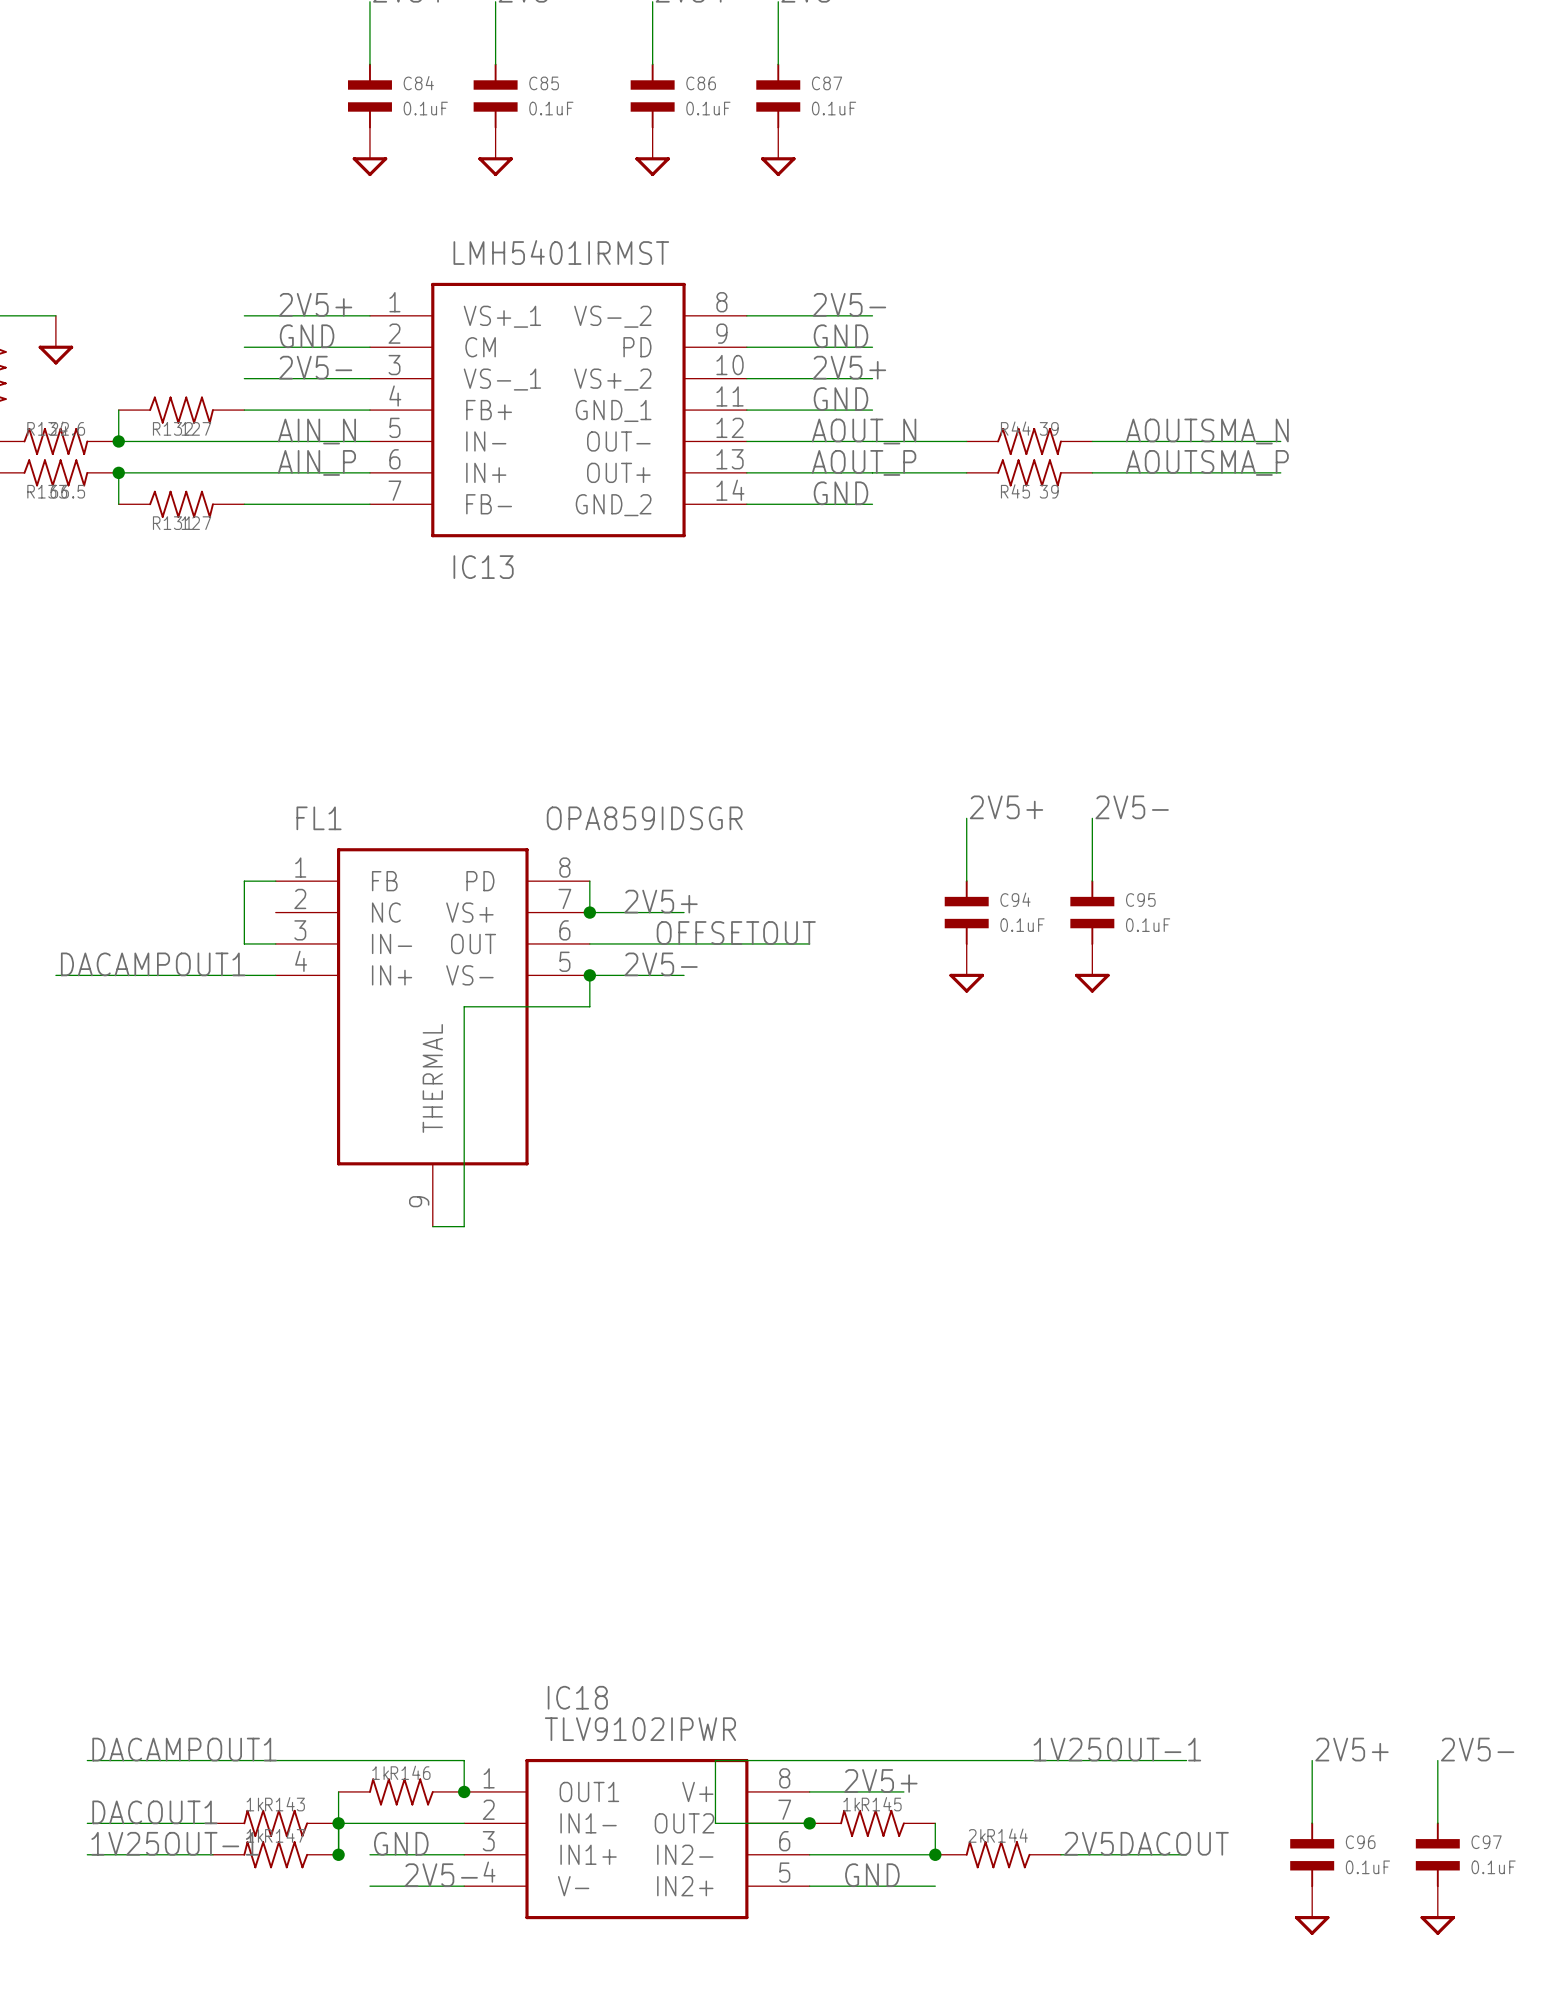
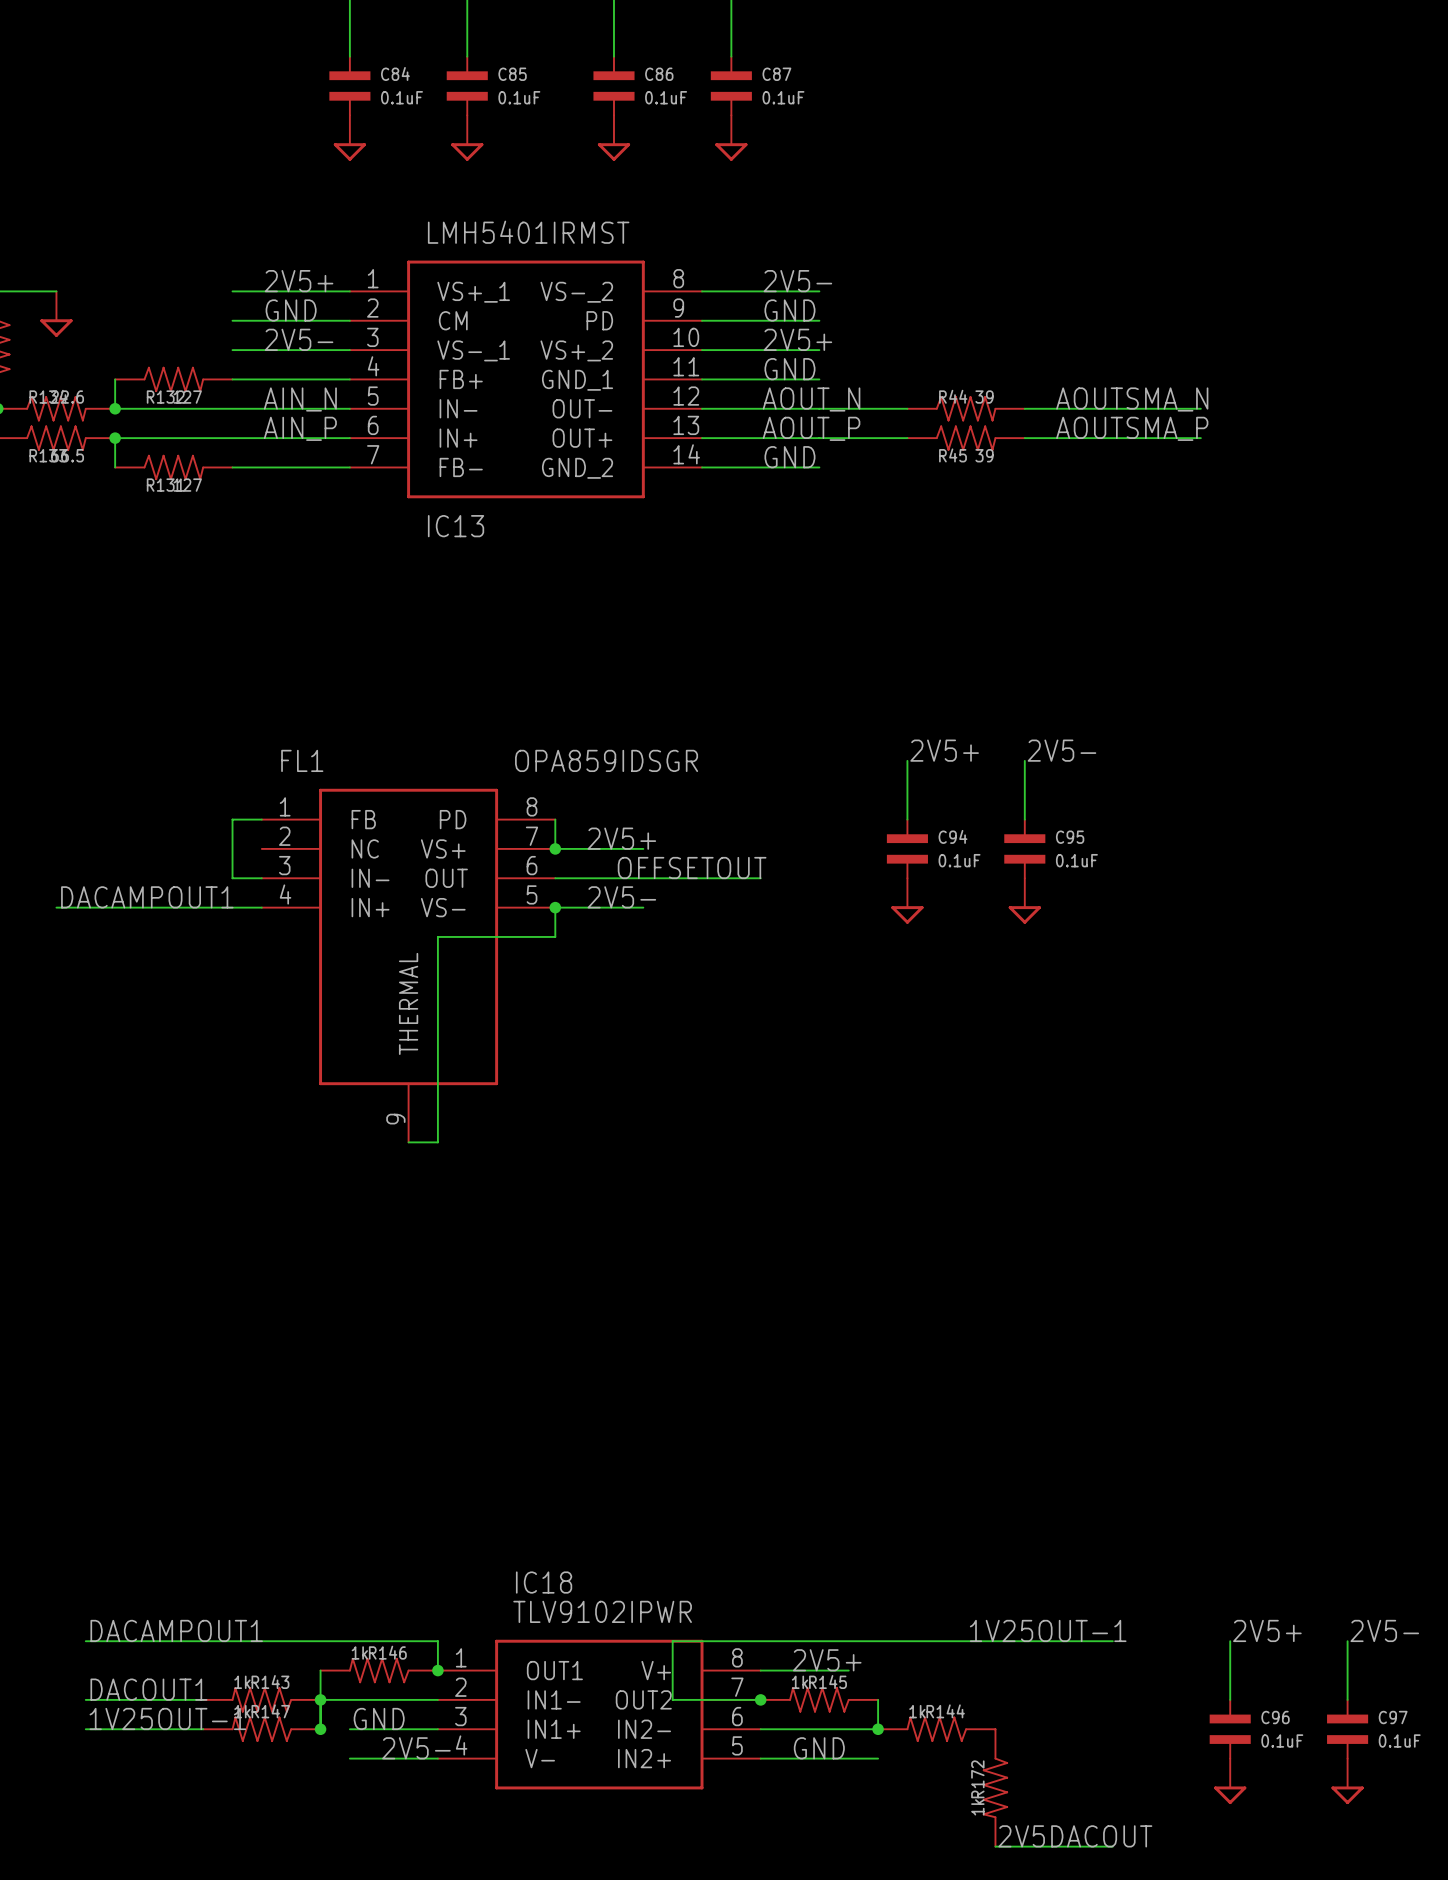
R144 value: 2k (977, 1835) -> 1k (917, 1711)
label position: 2V5DACOUT (1146, 1843) -> 2V5DACOUT (1075, 1836)
wire: (1060, 1854) (1186, 1854) -> (995, 1846) (1112, 1846)
R172: none -> 1k (995, 1787)

